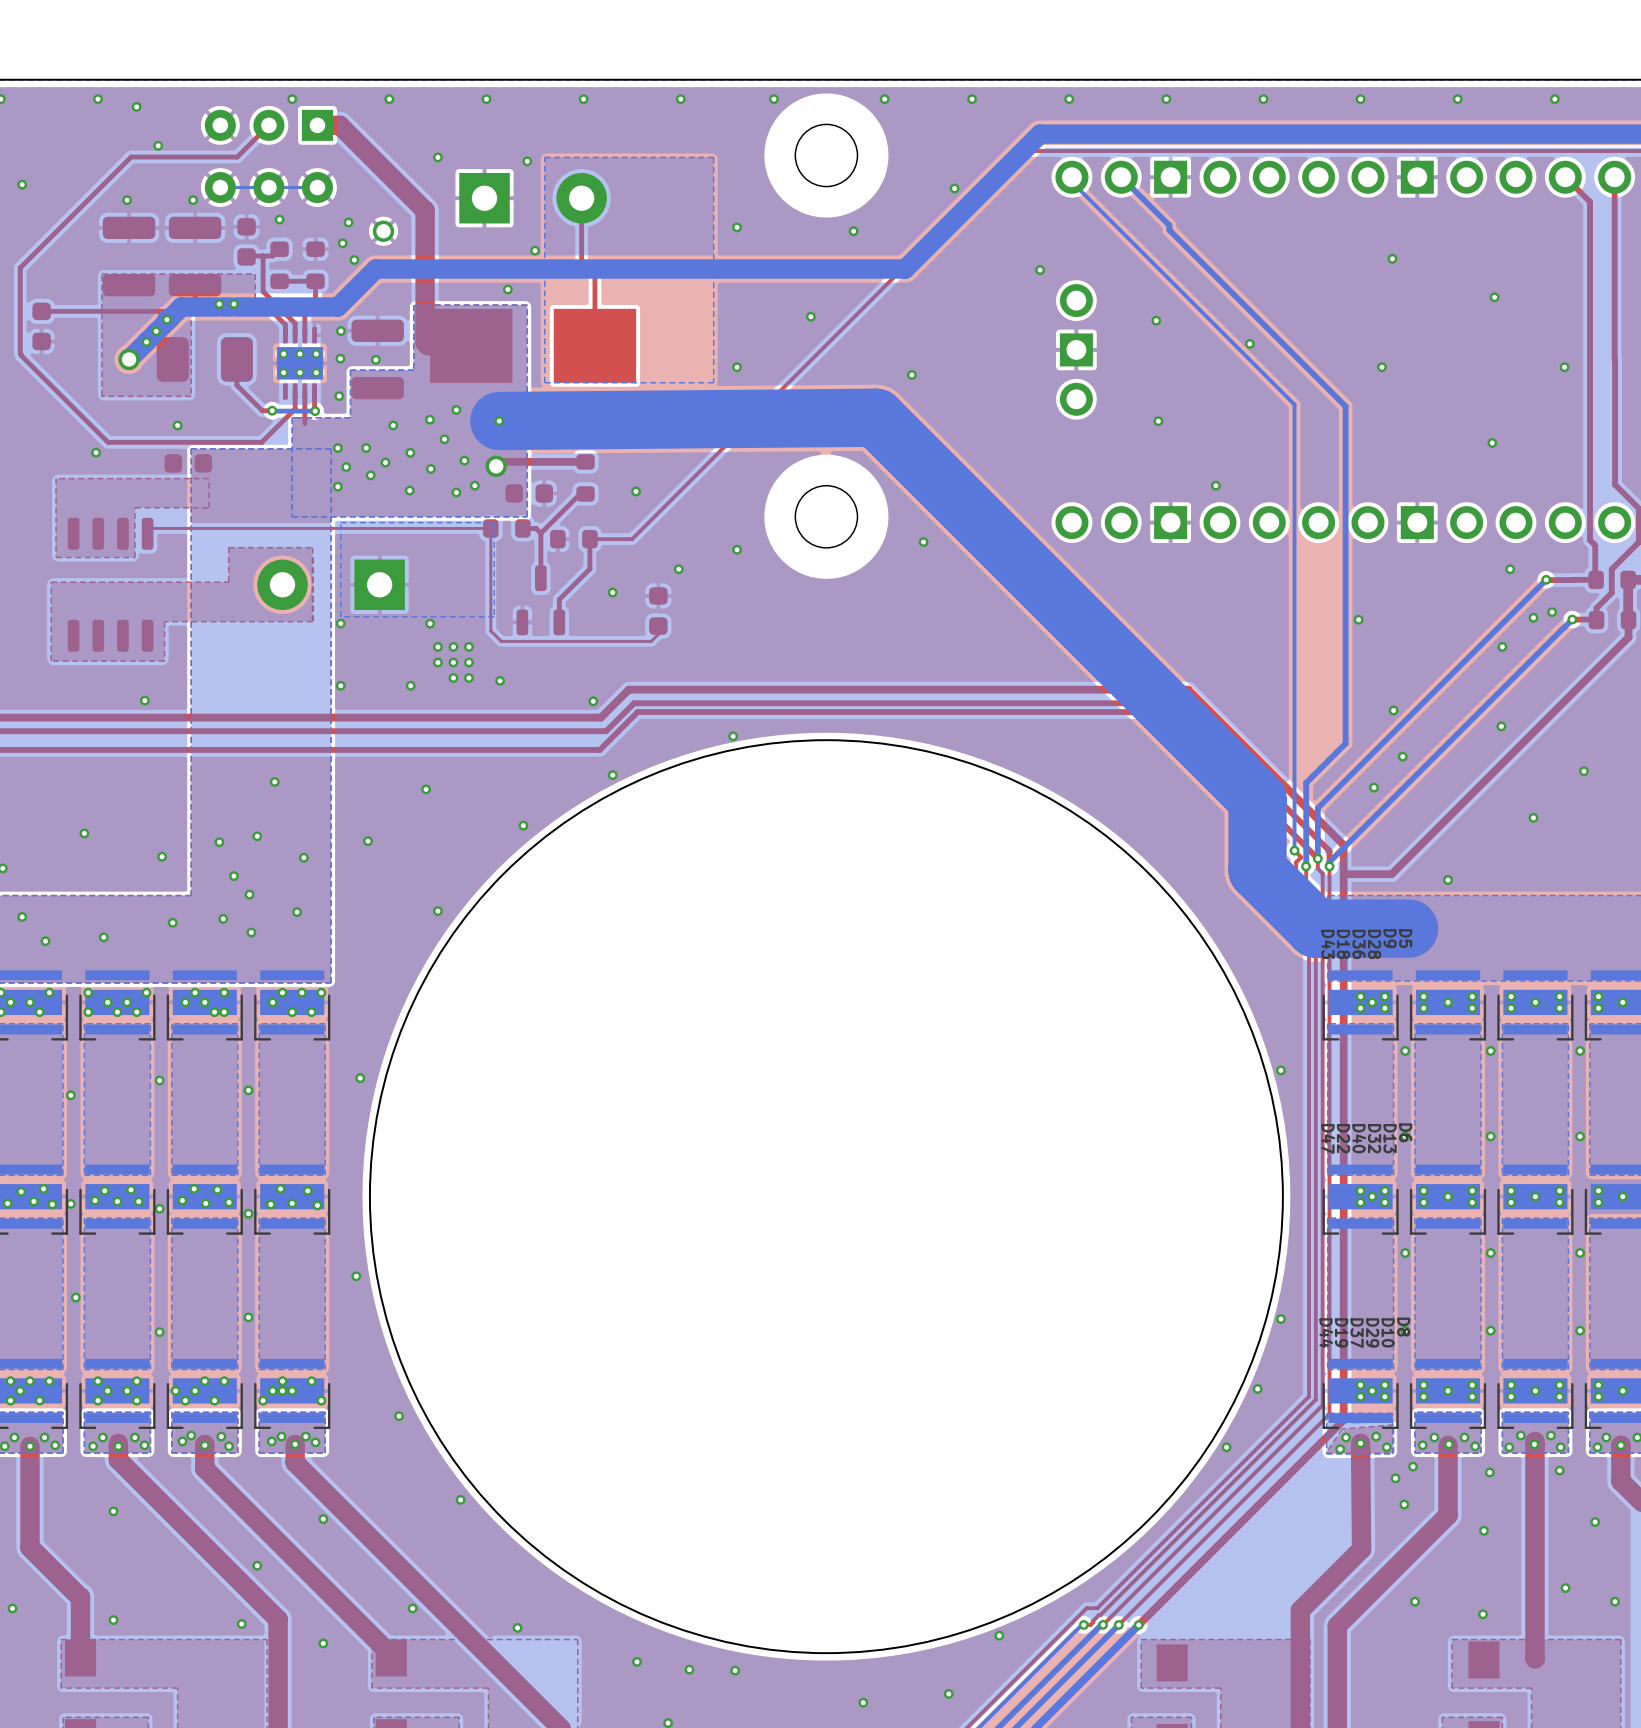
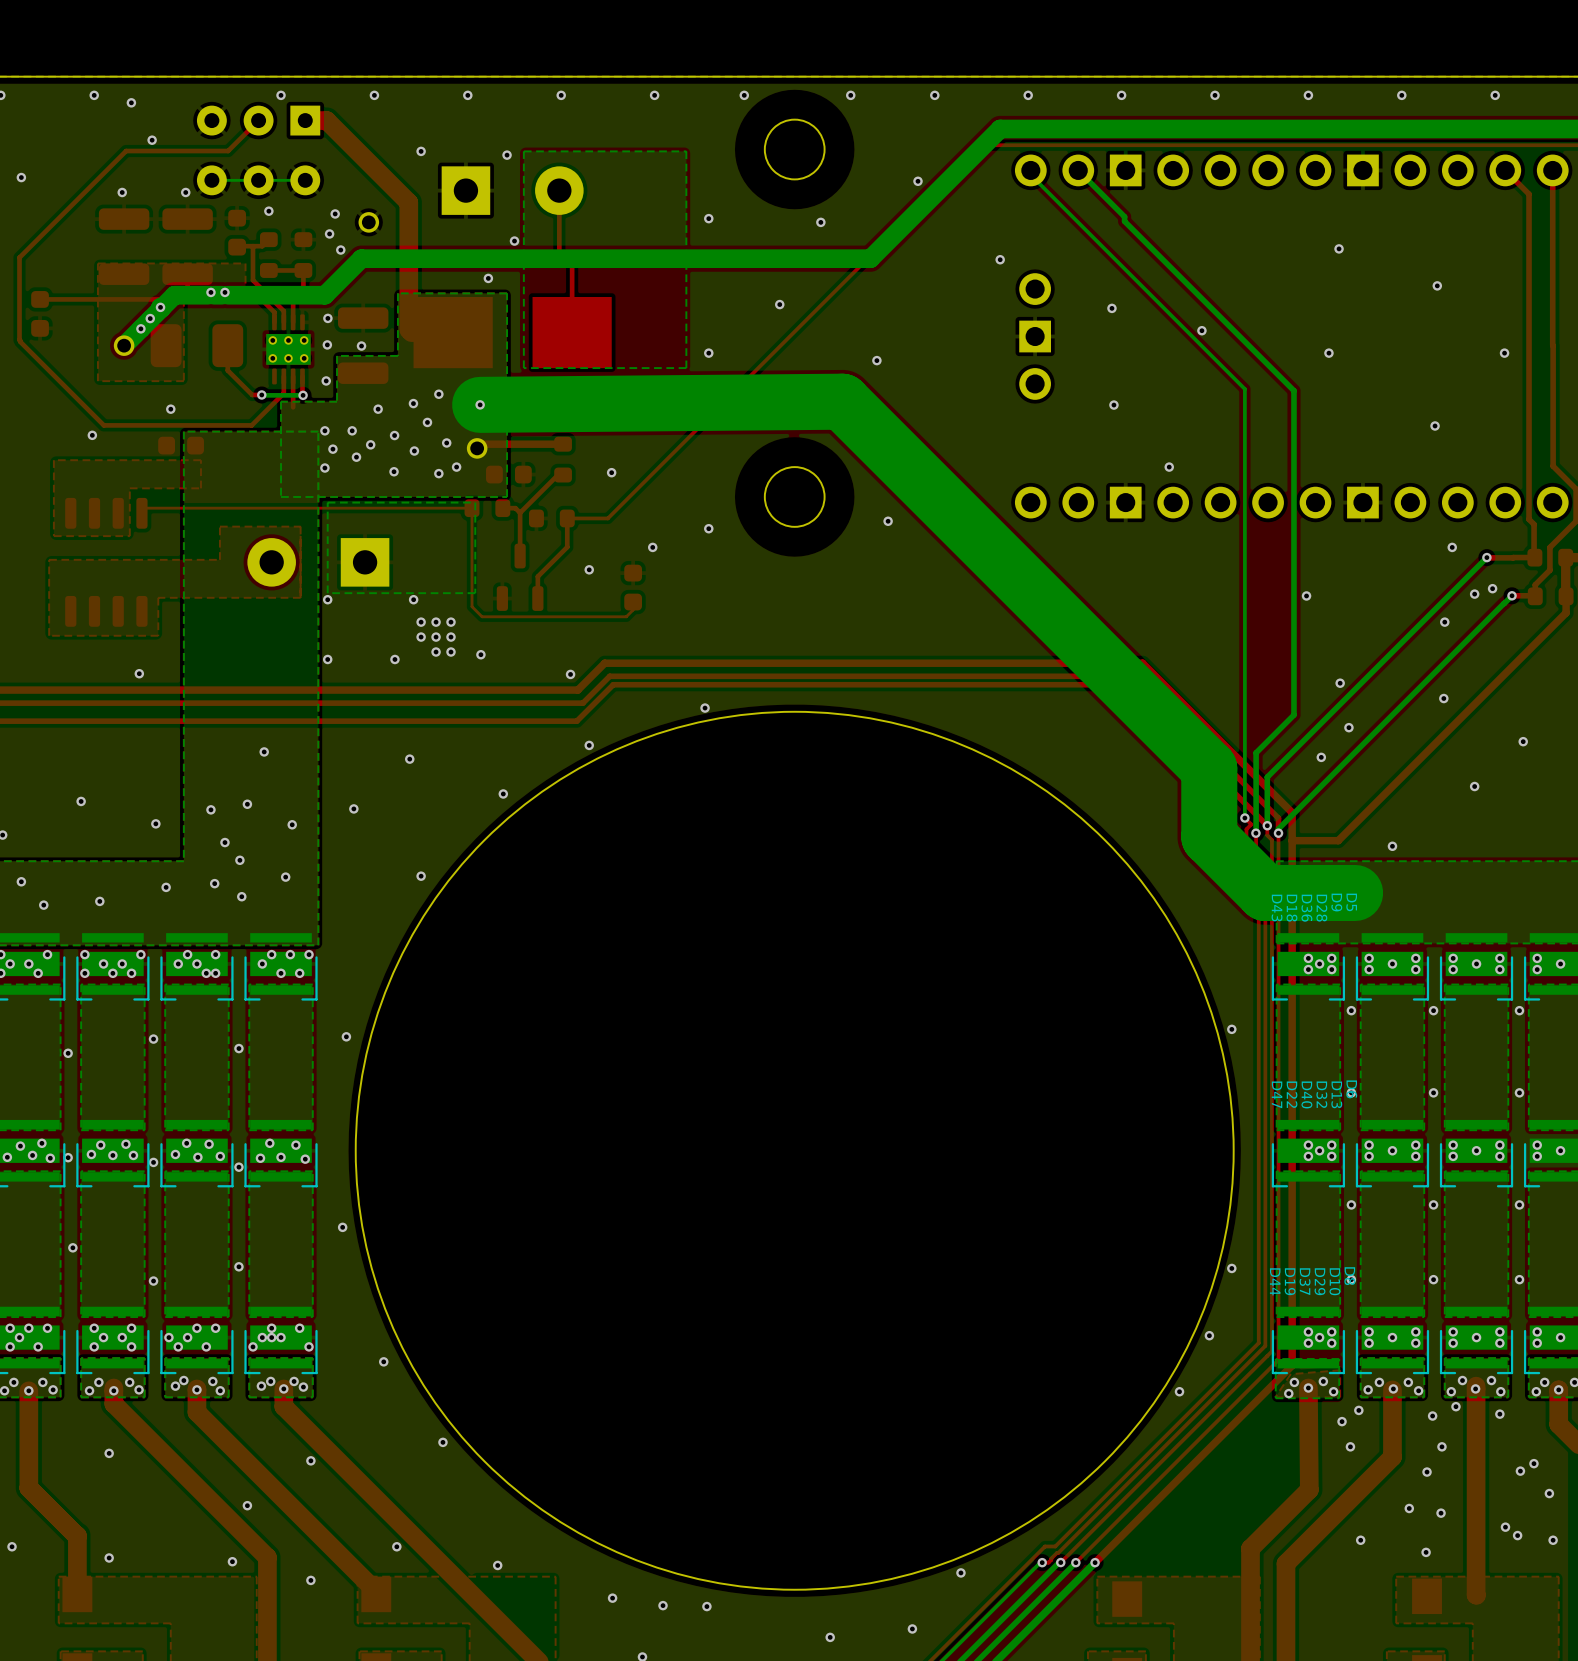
via: none -> (1455, 1406)
via: none -> (1441, 1446)
via: none -> (1520, 1471)
via: none -> (1549, 1493)
via: none -> (1409, 1508)
via: none -> (1441, 1513)
via: none -> (1517, 1535)

